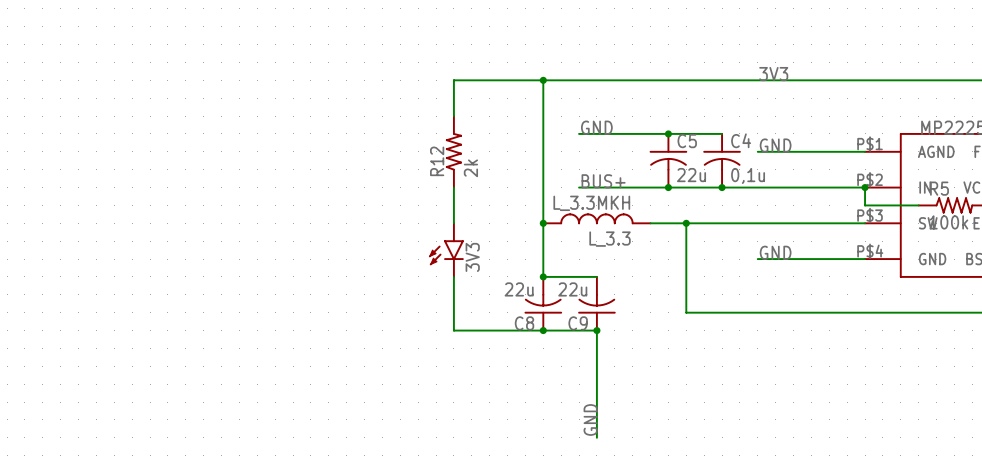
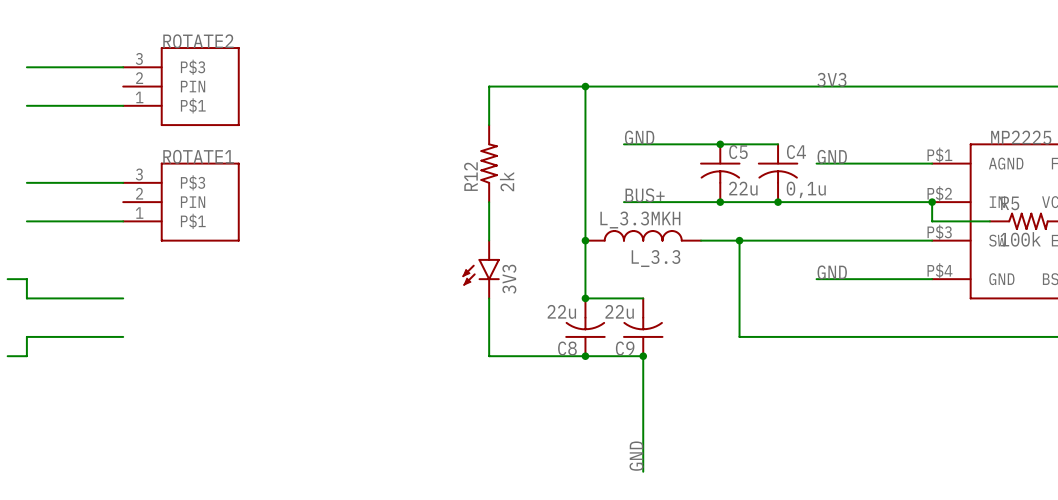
wire: none -> (26, 67) (123, 67)
ROTATE2: none -> (181, 86)
wire: none -> (26, 105) (123, 105)
wire: none -> (26, 182) (123, 182)
ROTATE1: none -> (181, 202)
wire: none -> (26, 221) (123, 221)
wire: none -> (7, 279) (26, 279) (26, 298) (123, 298)
wire: none -> (123, 336) (26, 336) (26, 356) (7, 356)

